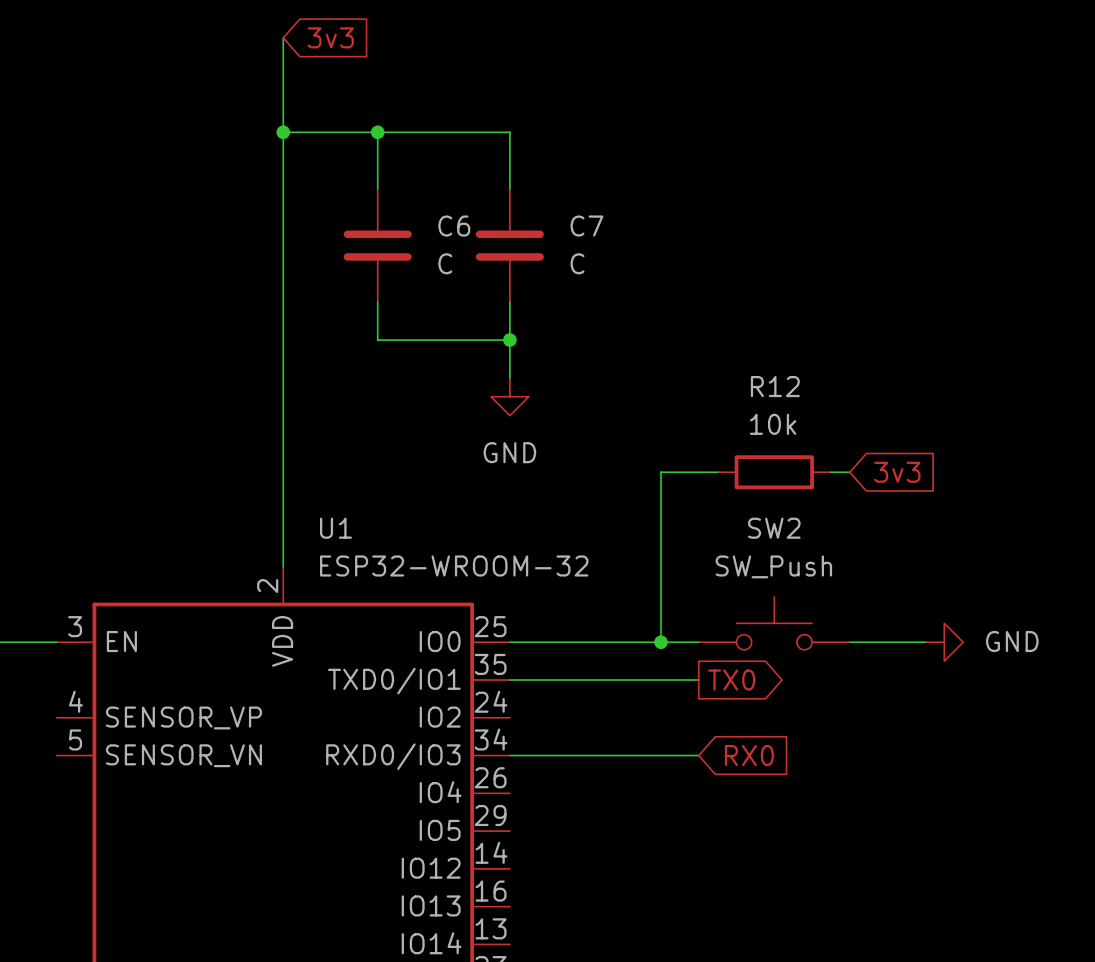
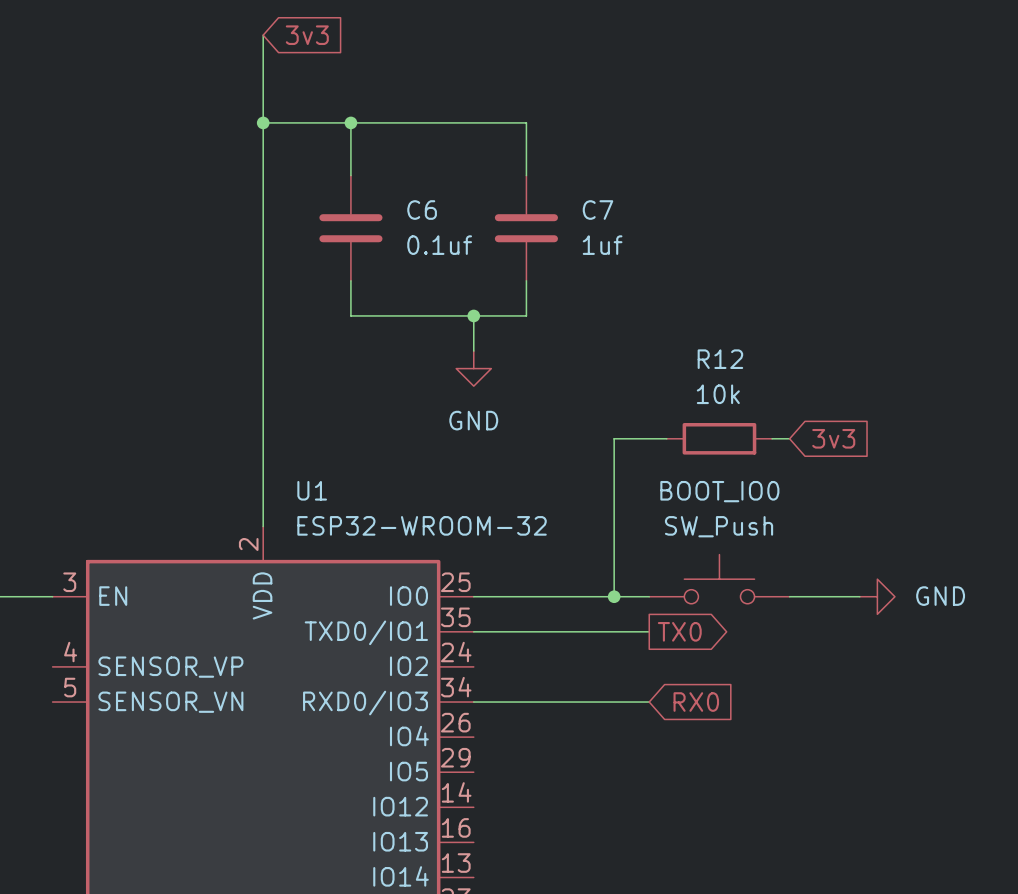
wire: (509, 132) (509, 188) -> (473, 122) (526, 122) (526, 175)
C7 position: (509, 245) -> (526, 228)
C6 value: C (445, 263) -> 0.1uf (439, 245)
C7 value: C (577, 263) -> 1uf (602, 245)
wire: (509, 302) (509, 340) -> (526, 280) (526, 315) (473, 315)
SW2 name: SW2 (774, 528) -> BOOT_IO0 (719, 491)

